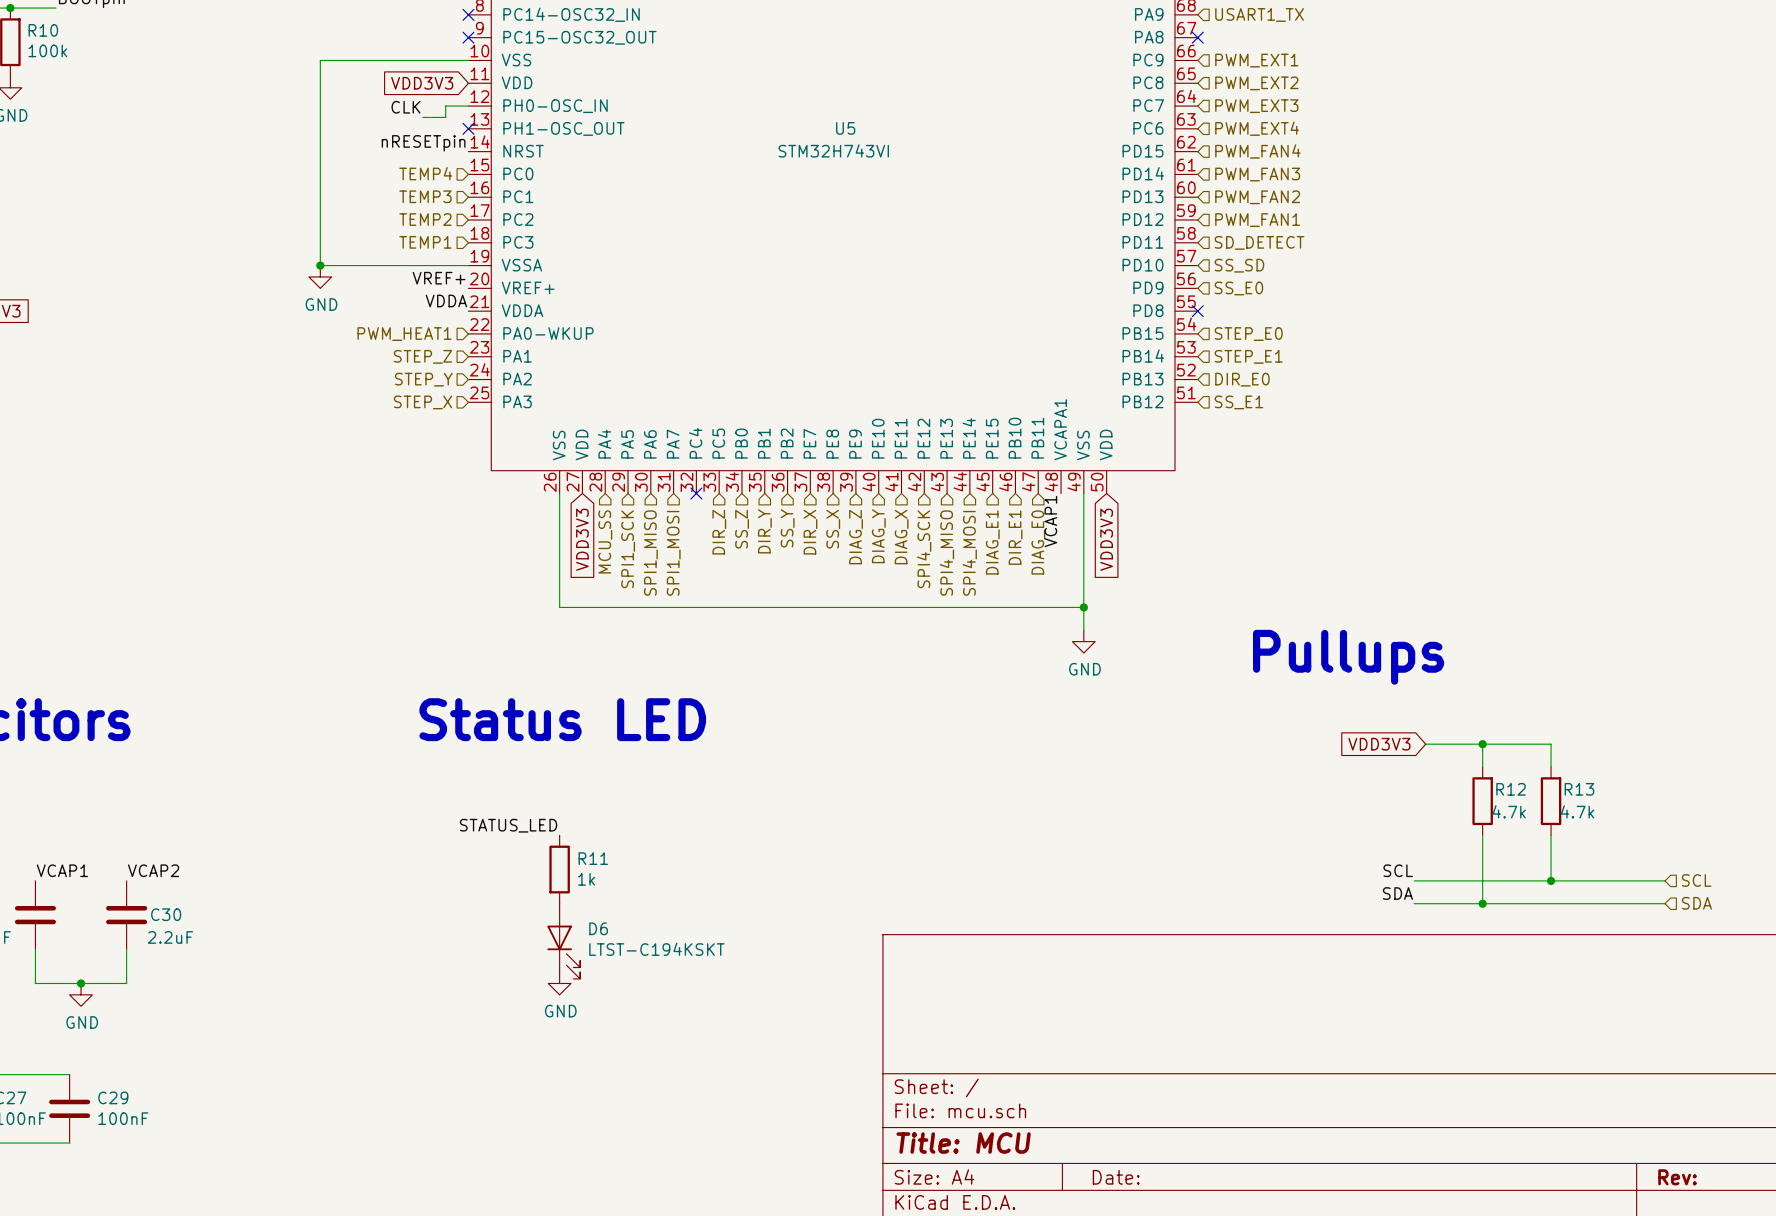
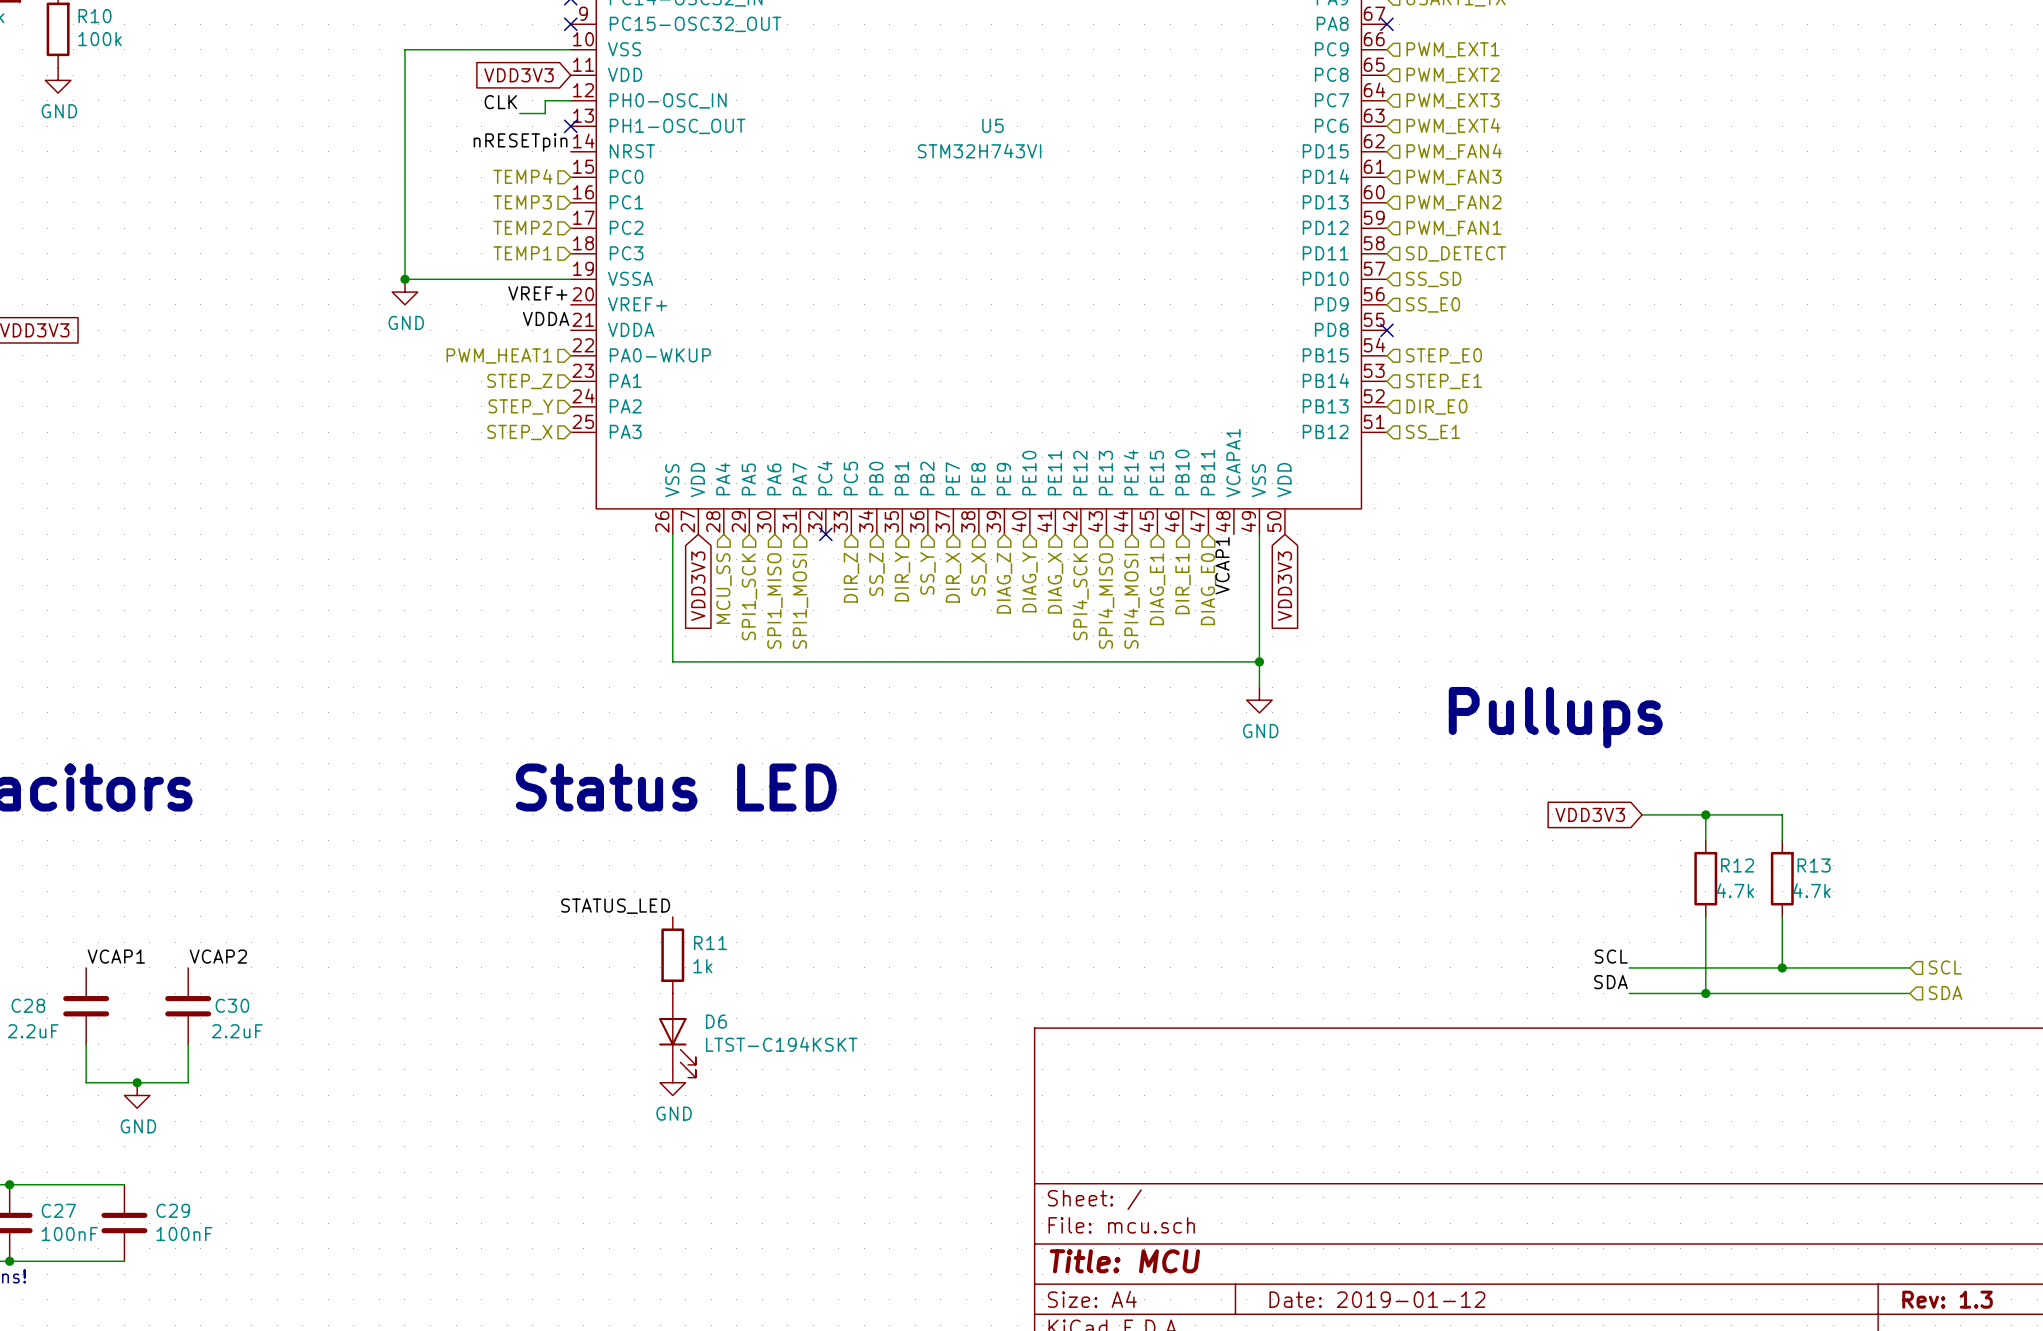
title block: Date: (1116, 1177) -> Date: 2019-01-12 (1377, 1299)
title block: Rev: (1677, 1177) -> Rev: 1.3 (1947, 1299)

